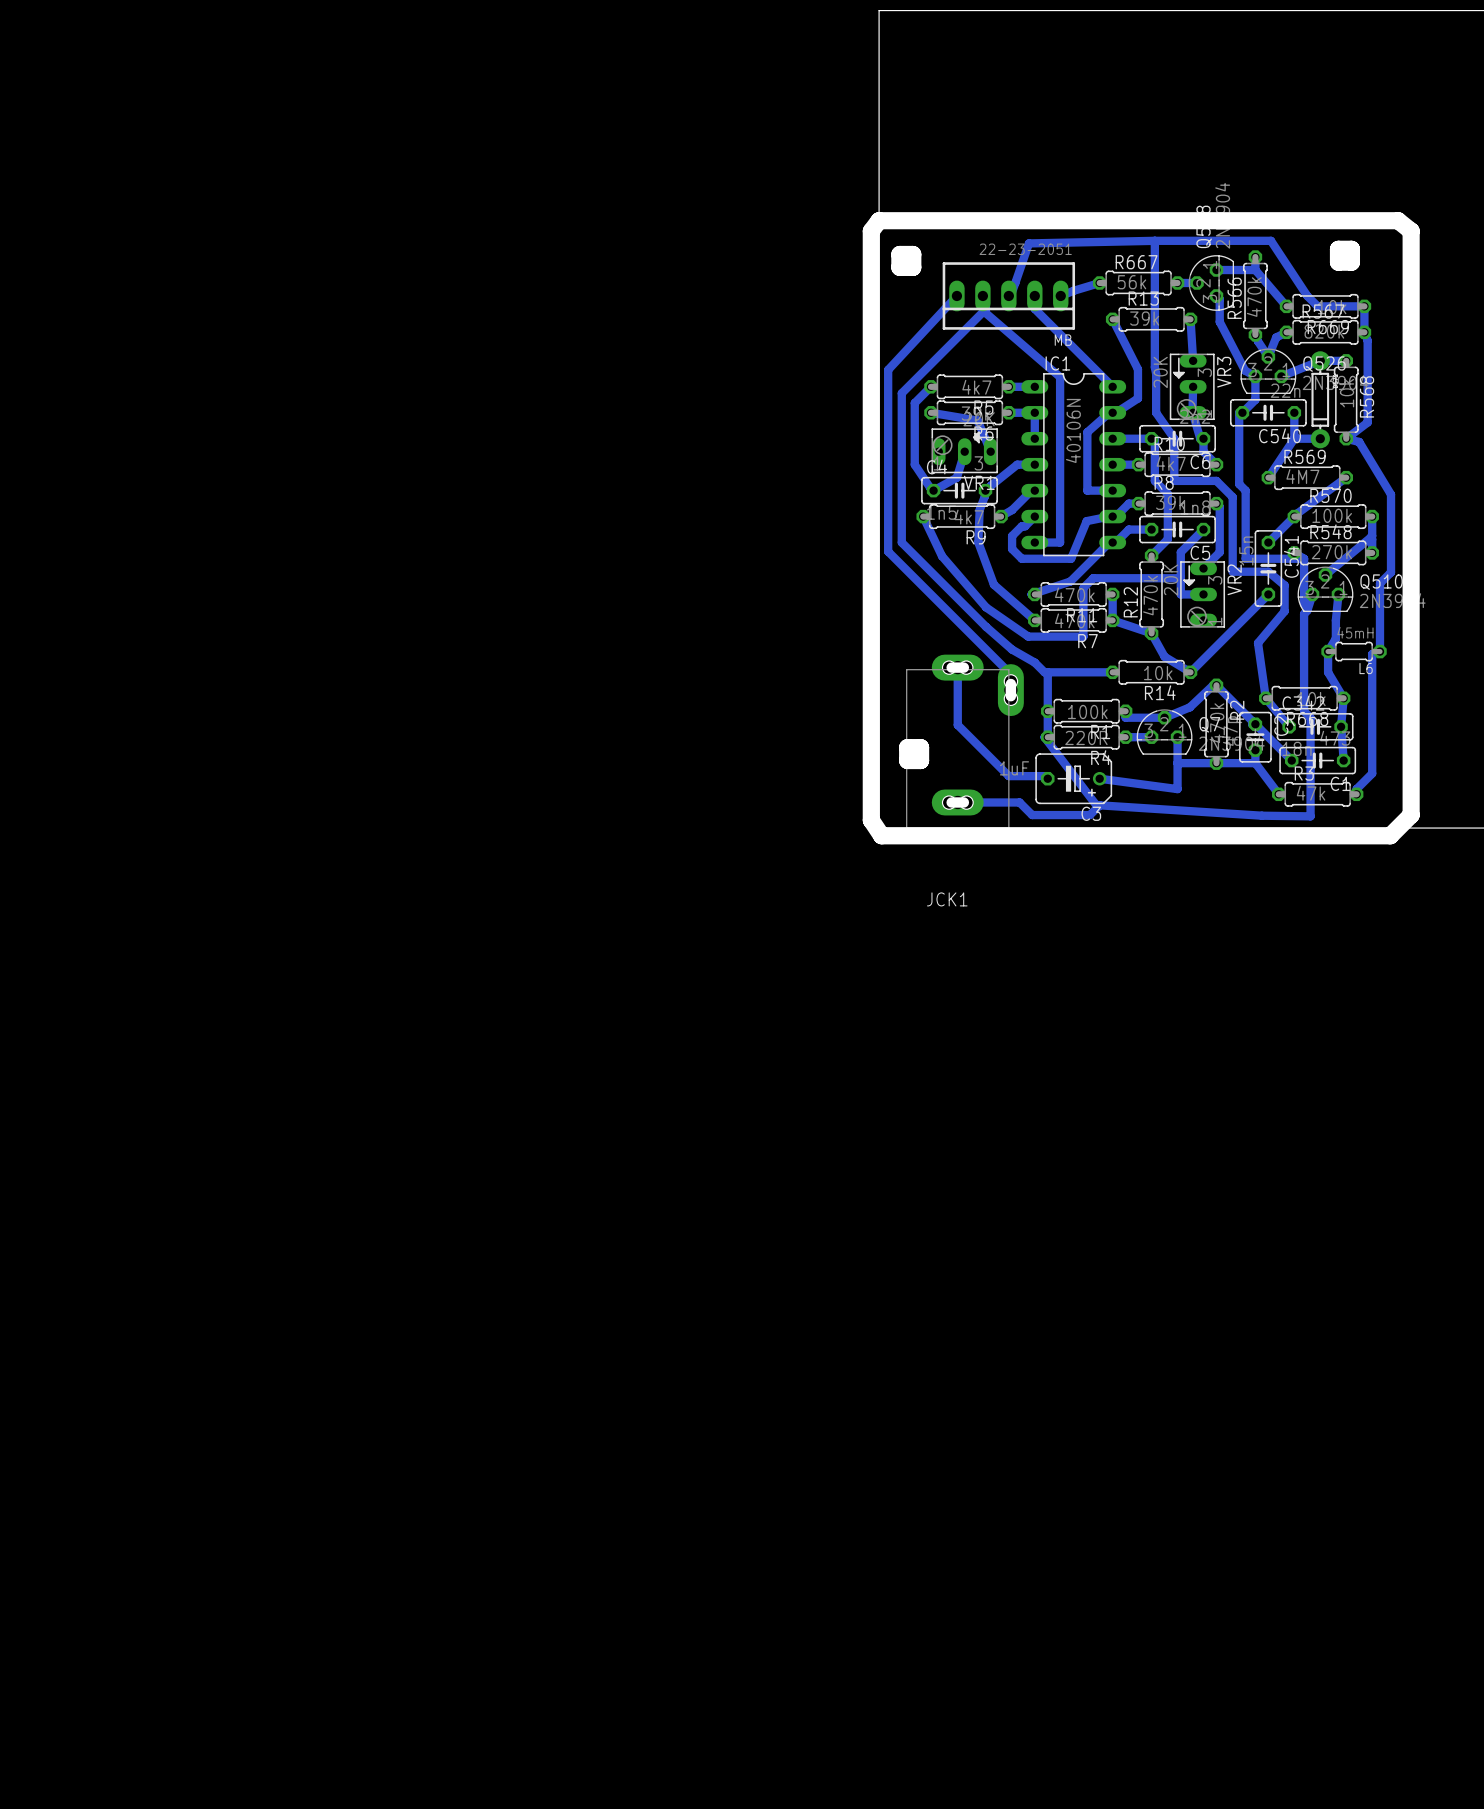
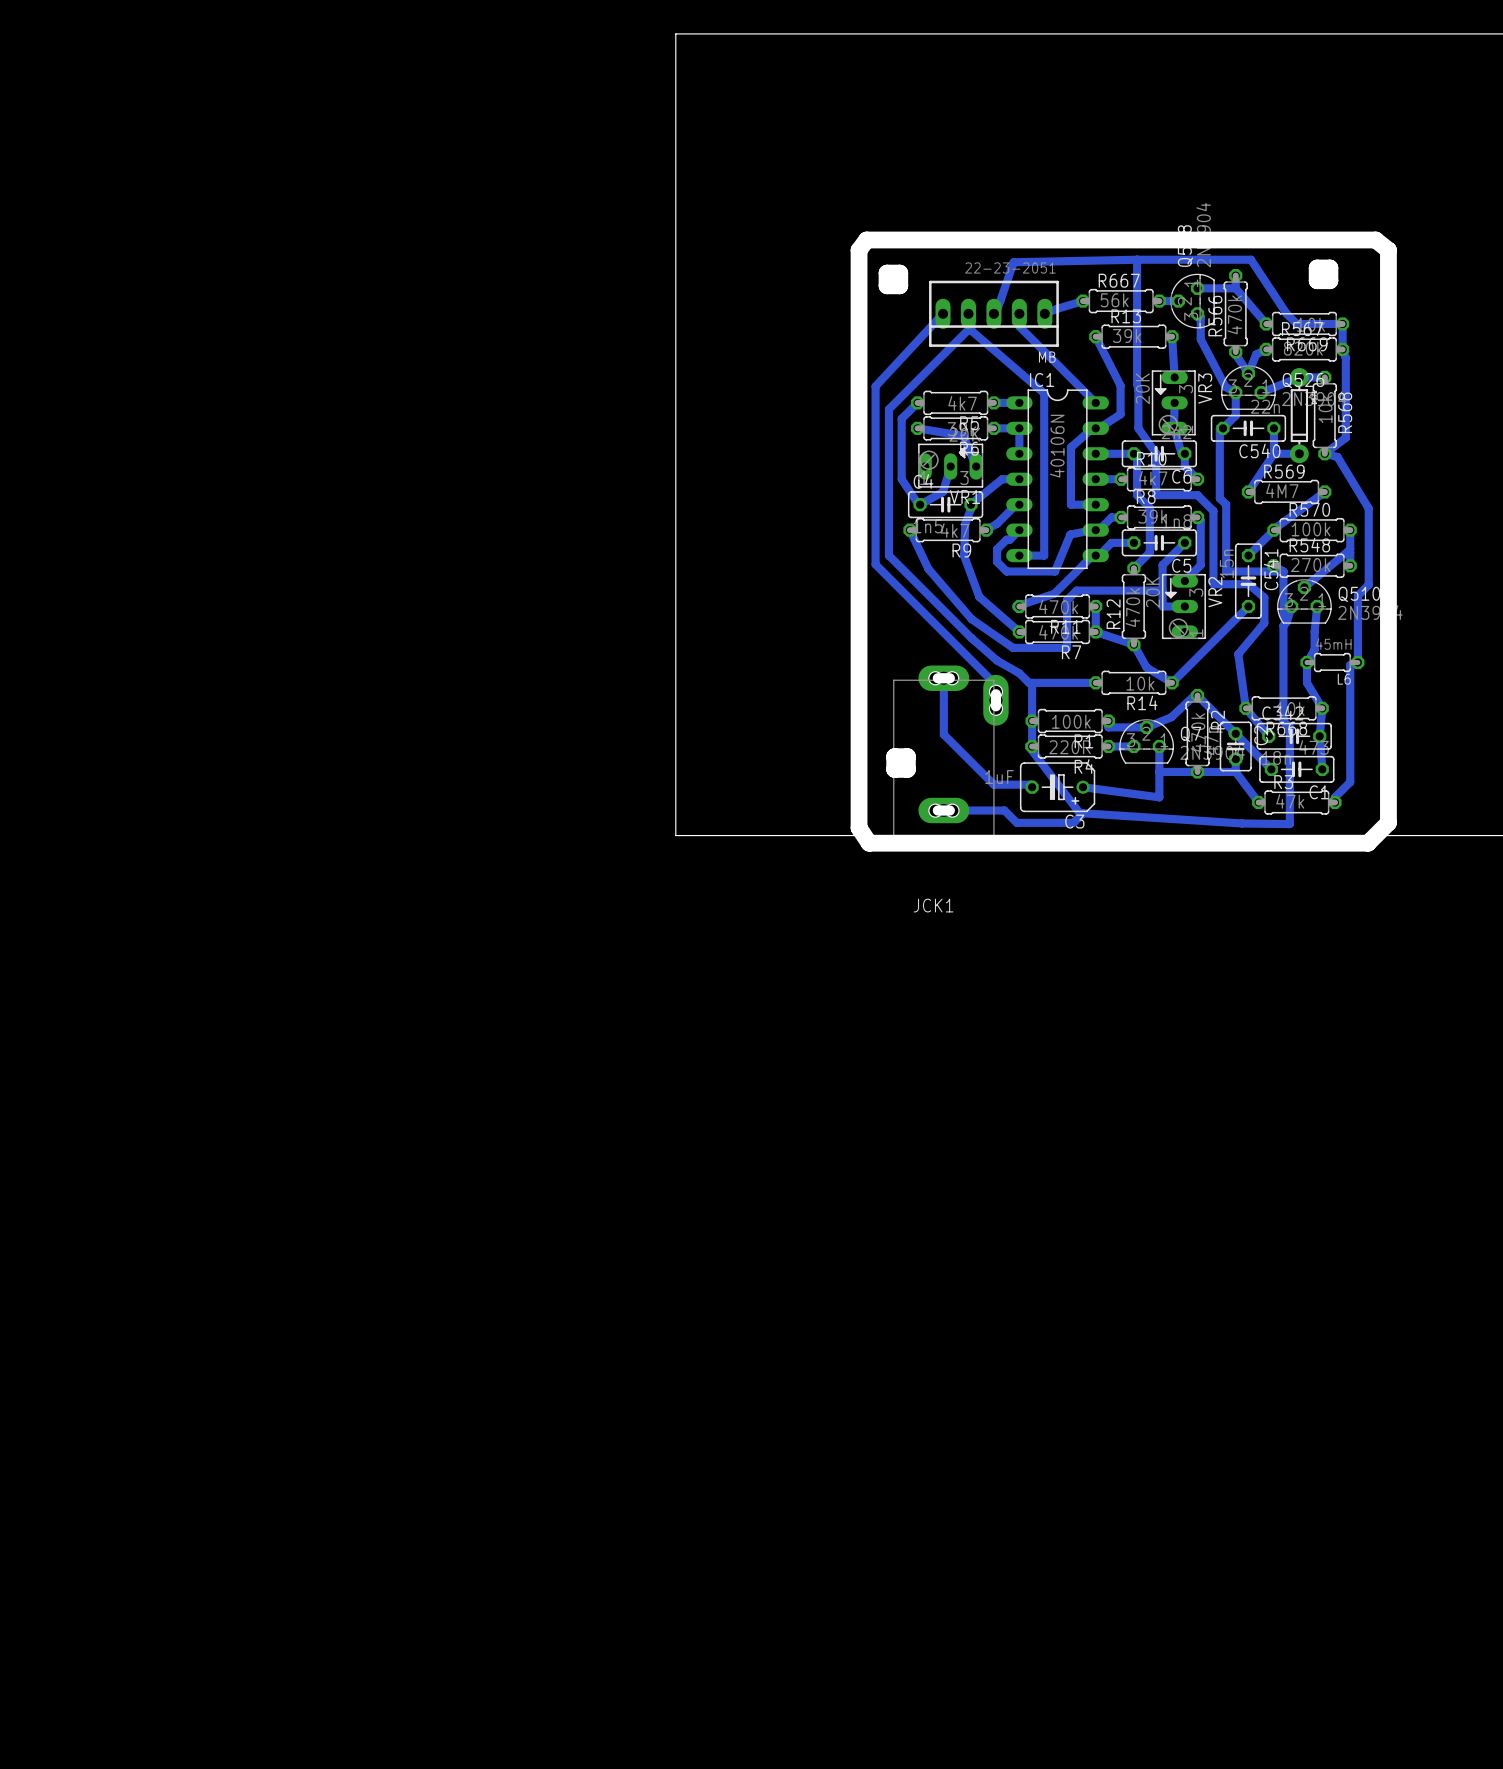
board edge: (879, 10) (879, 828) -> (866, 33) (675, 33) (675, 835) (866, 835)

